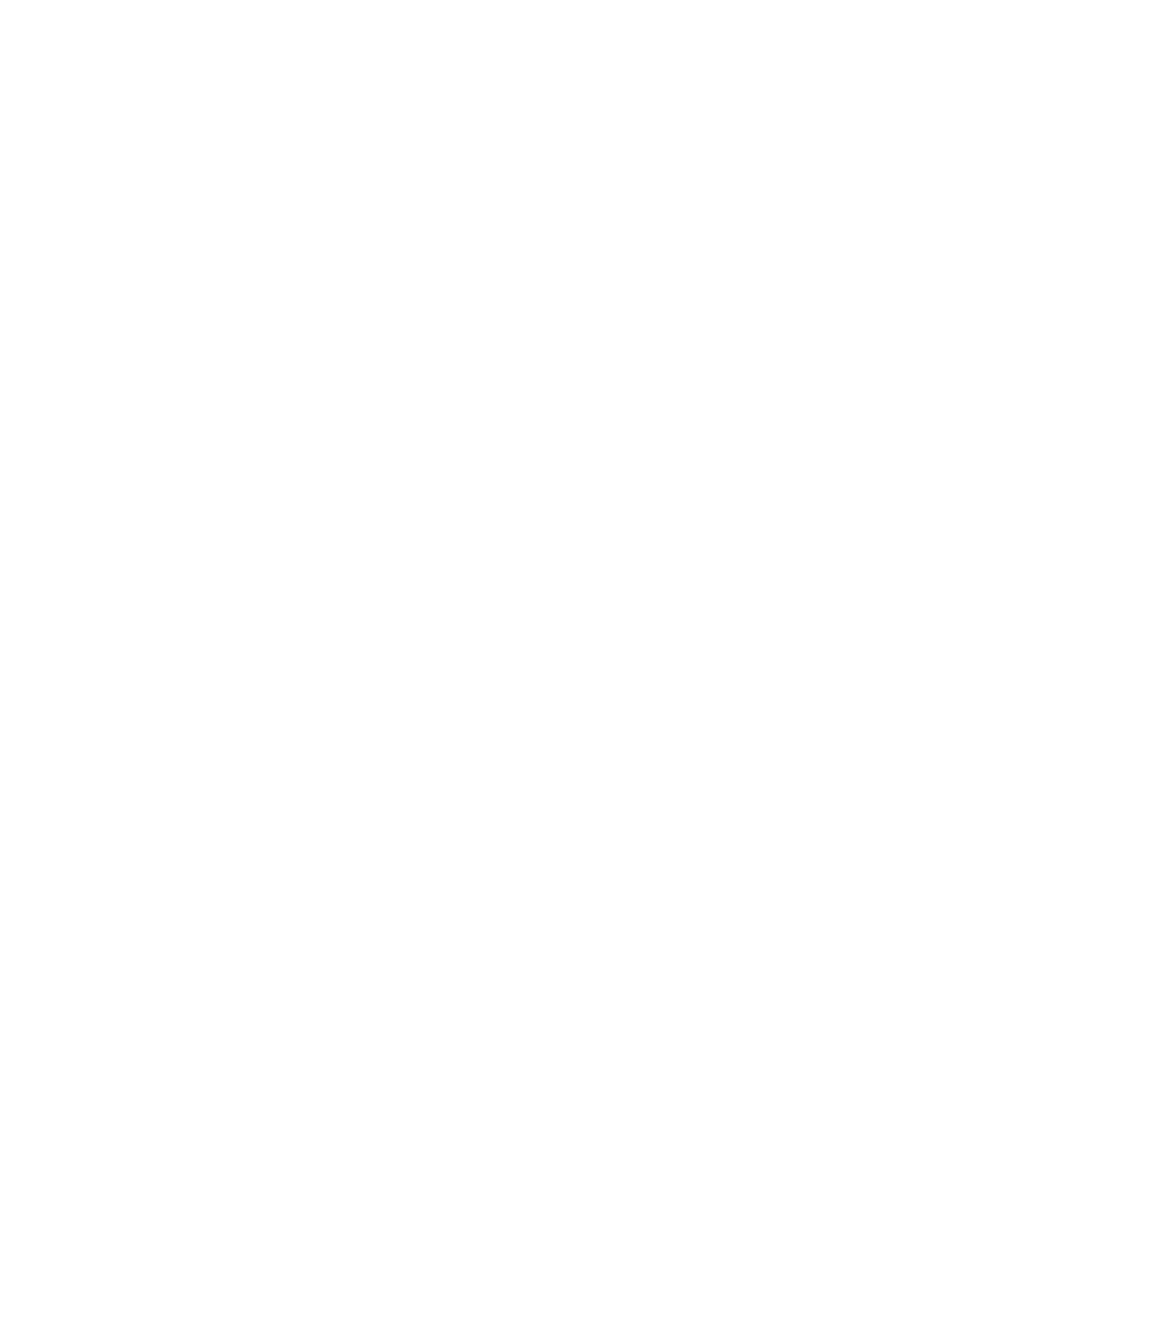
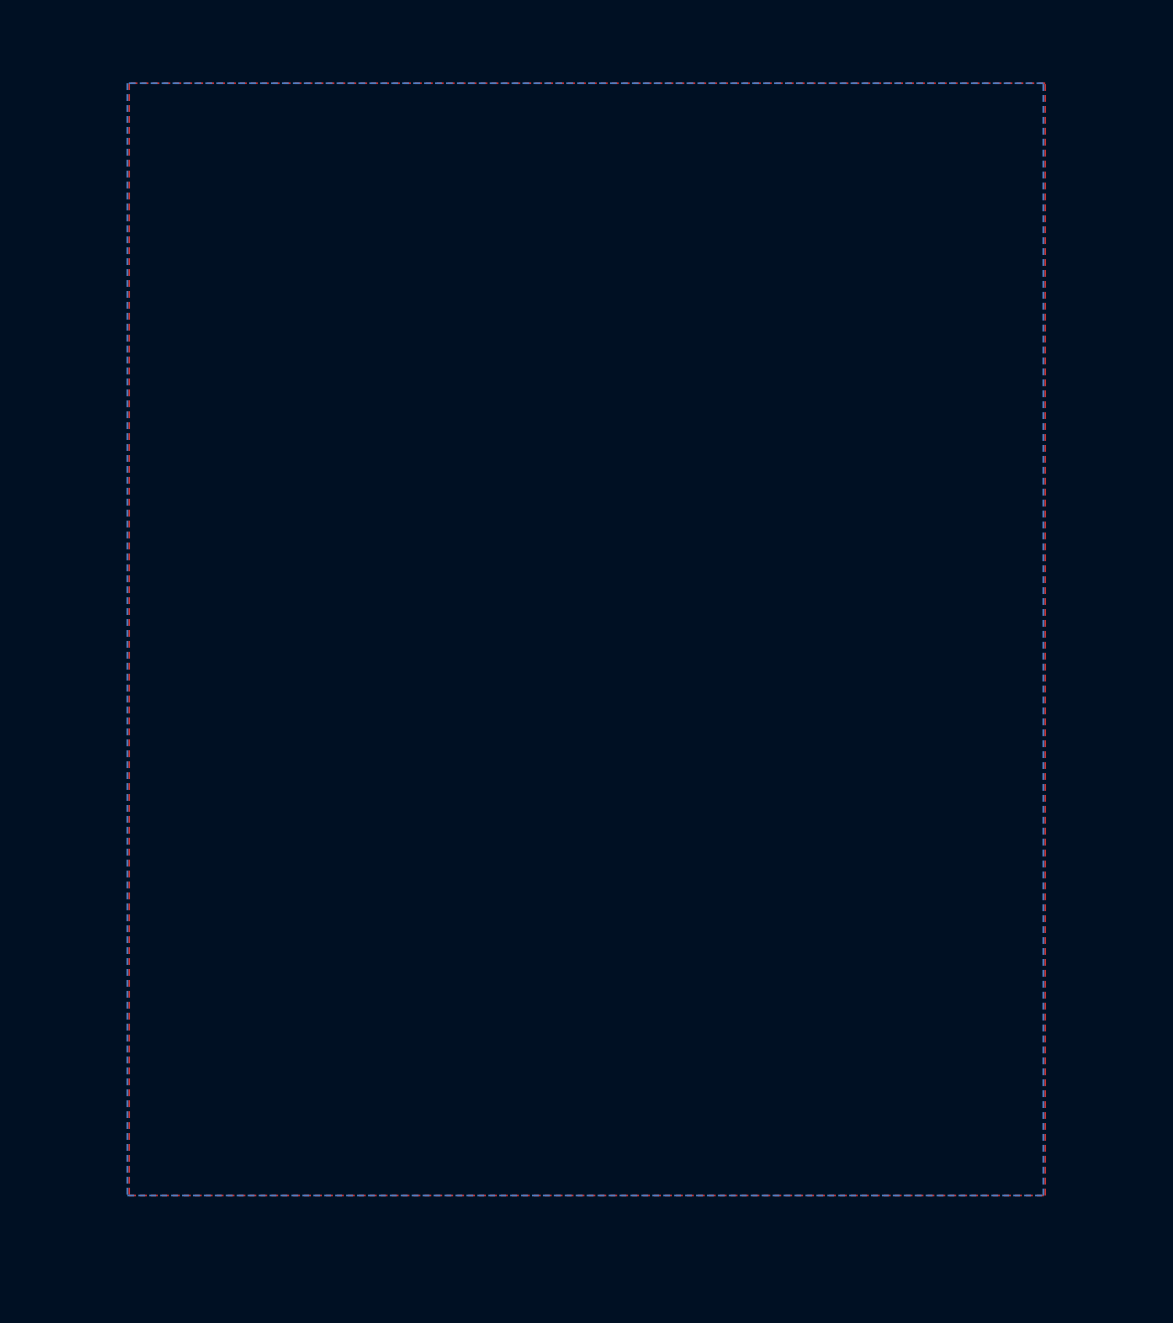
bottom zone outline: none -> (1043, 83) (1043, 1195) (127, 1195) (127, 83) (1043, 83)
top zone outline: none -> (1045, 83) (1045, 1195) (129, 1195) (129, 83) (1045, 83)

